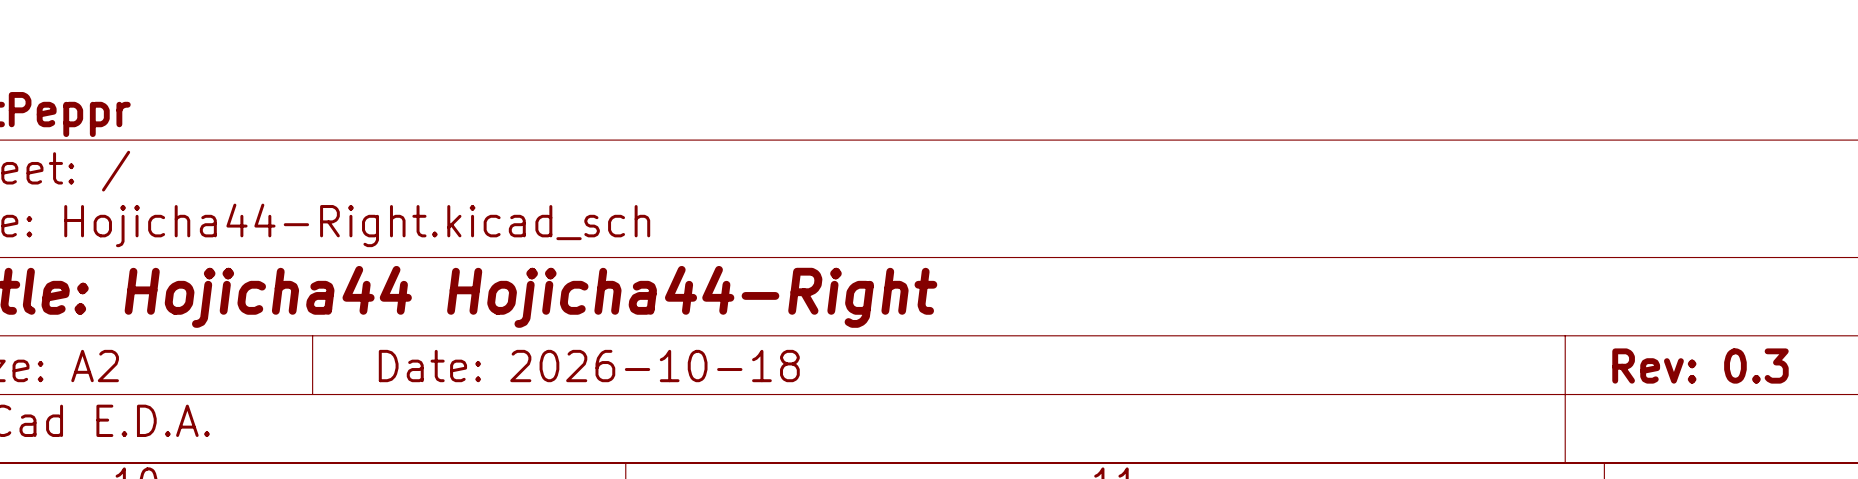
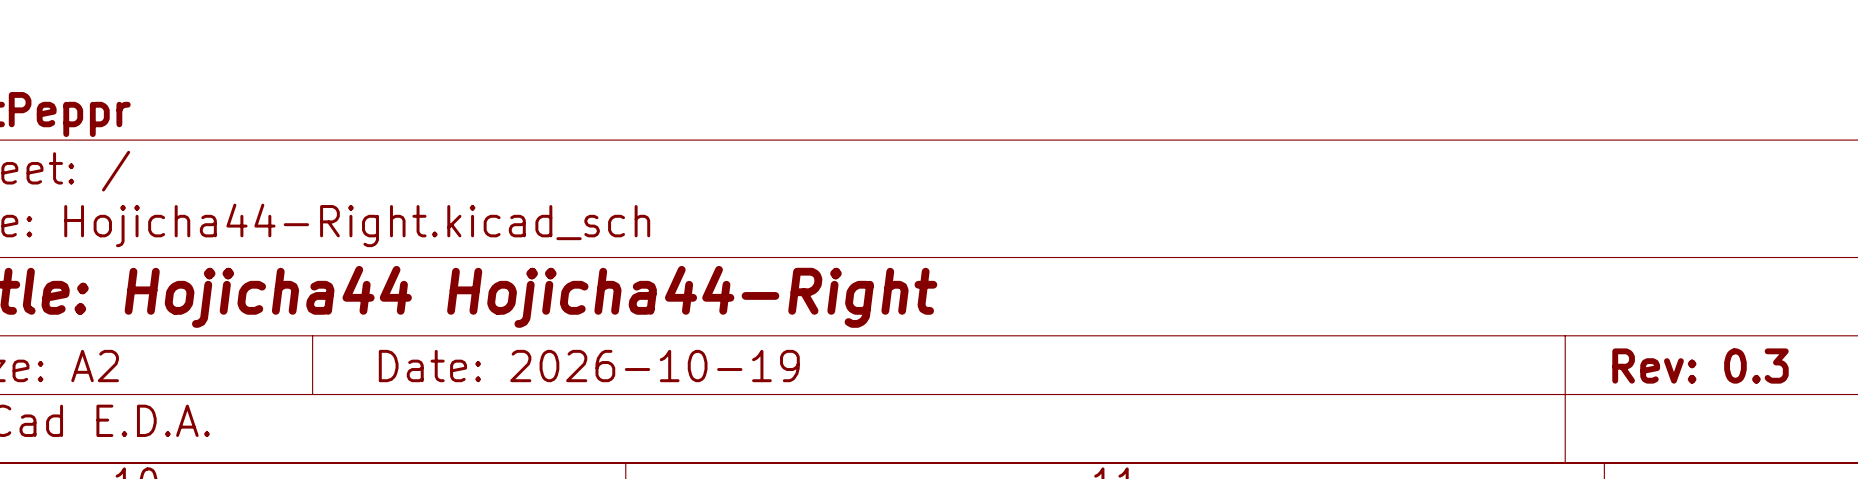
title block: Date: 2026-10-18 (589, 366) -> Date: 2026-10-19 (589, 366)

